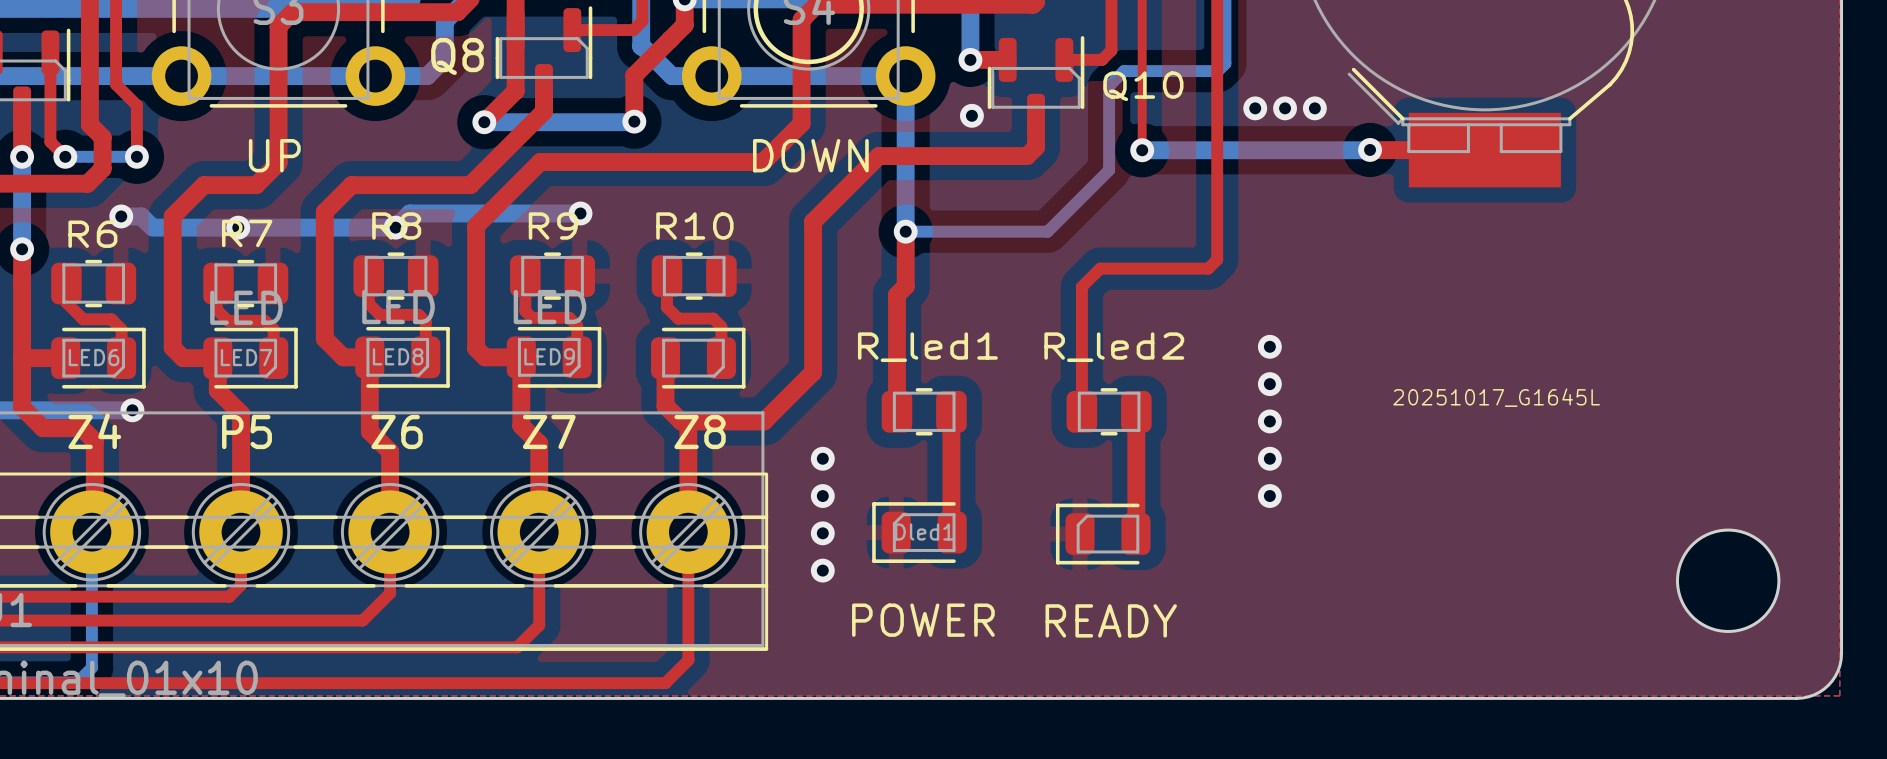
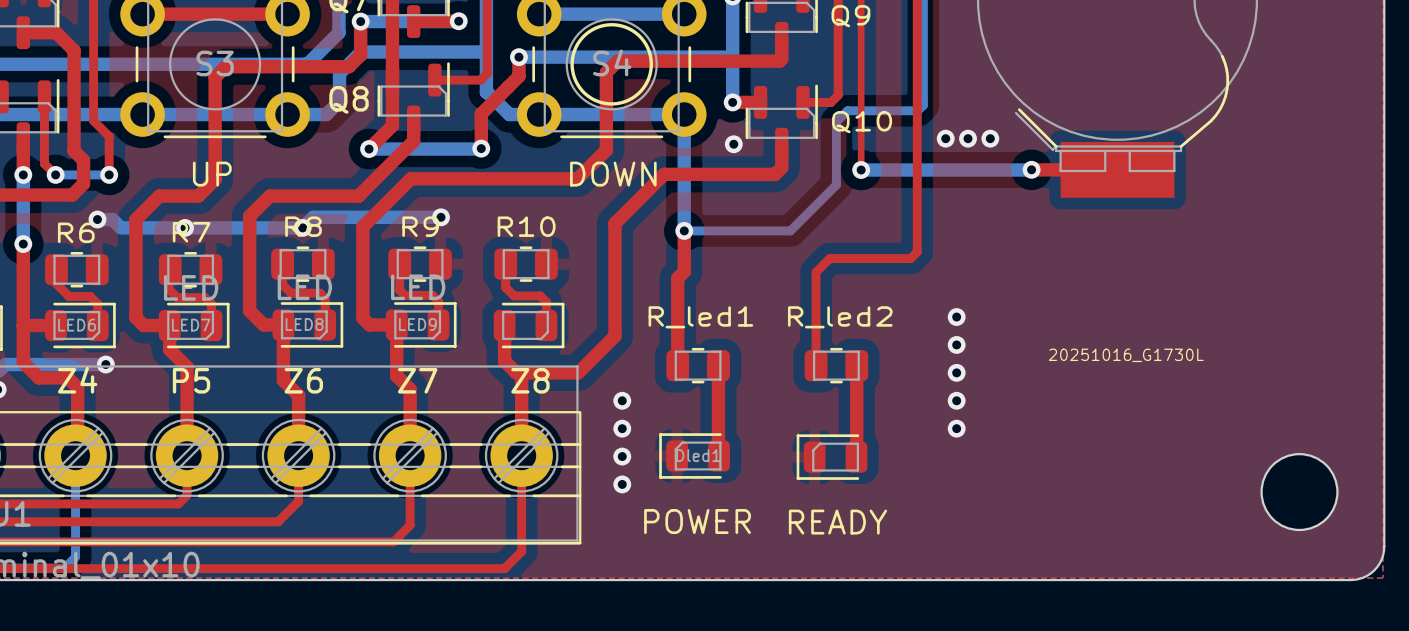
text: 20251017_G1645L (1496, 397) -> 20251016_G1730L (1126, 355)

